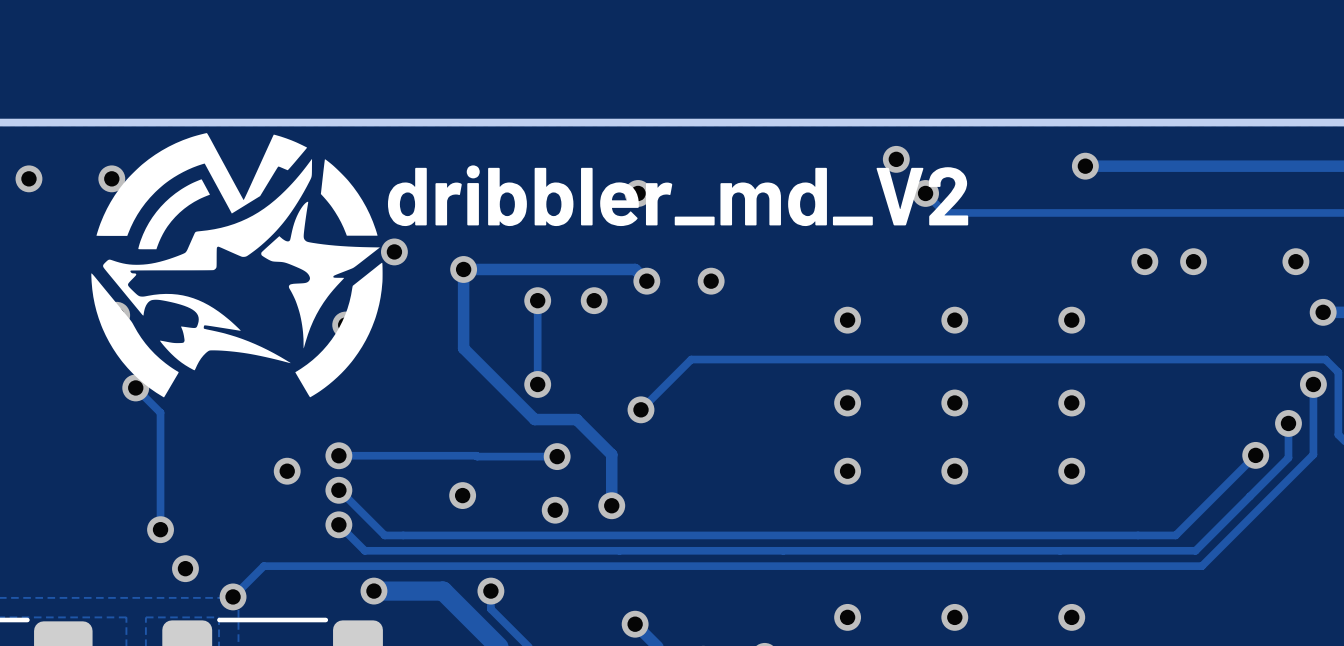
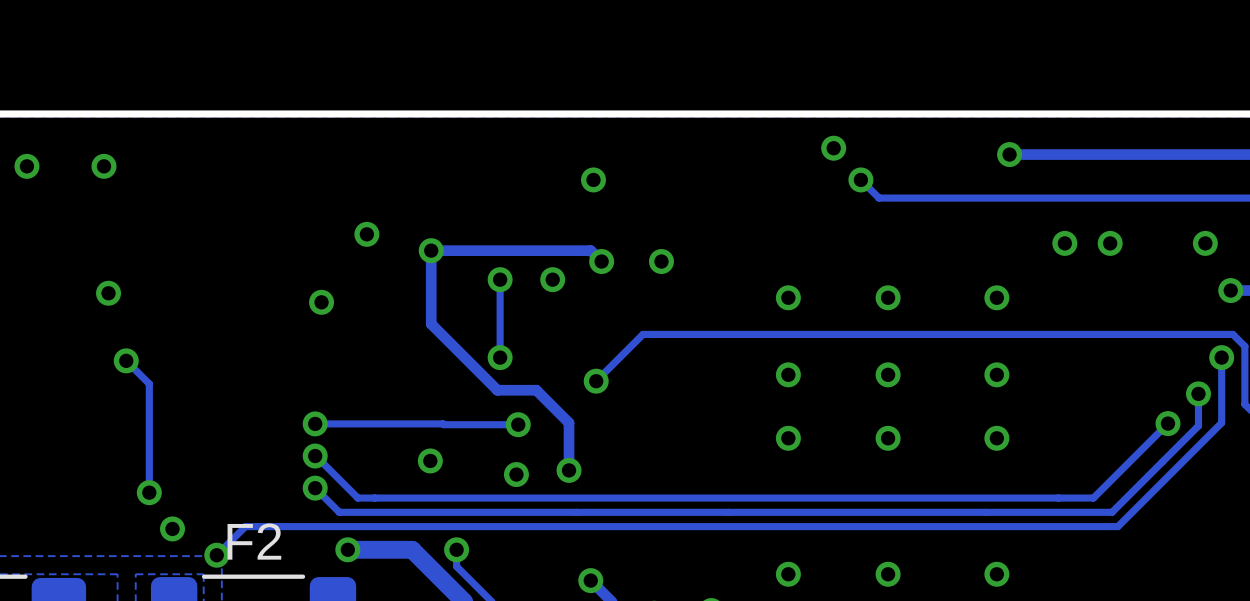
drawing: [91, 133, 383, 398] -> none
text: dribbler_md_V2 (678, 195) -> none
via: (287, 471) -> none
F2 name: none -> F2 (254, 541)

